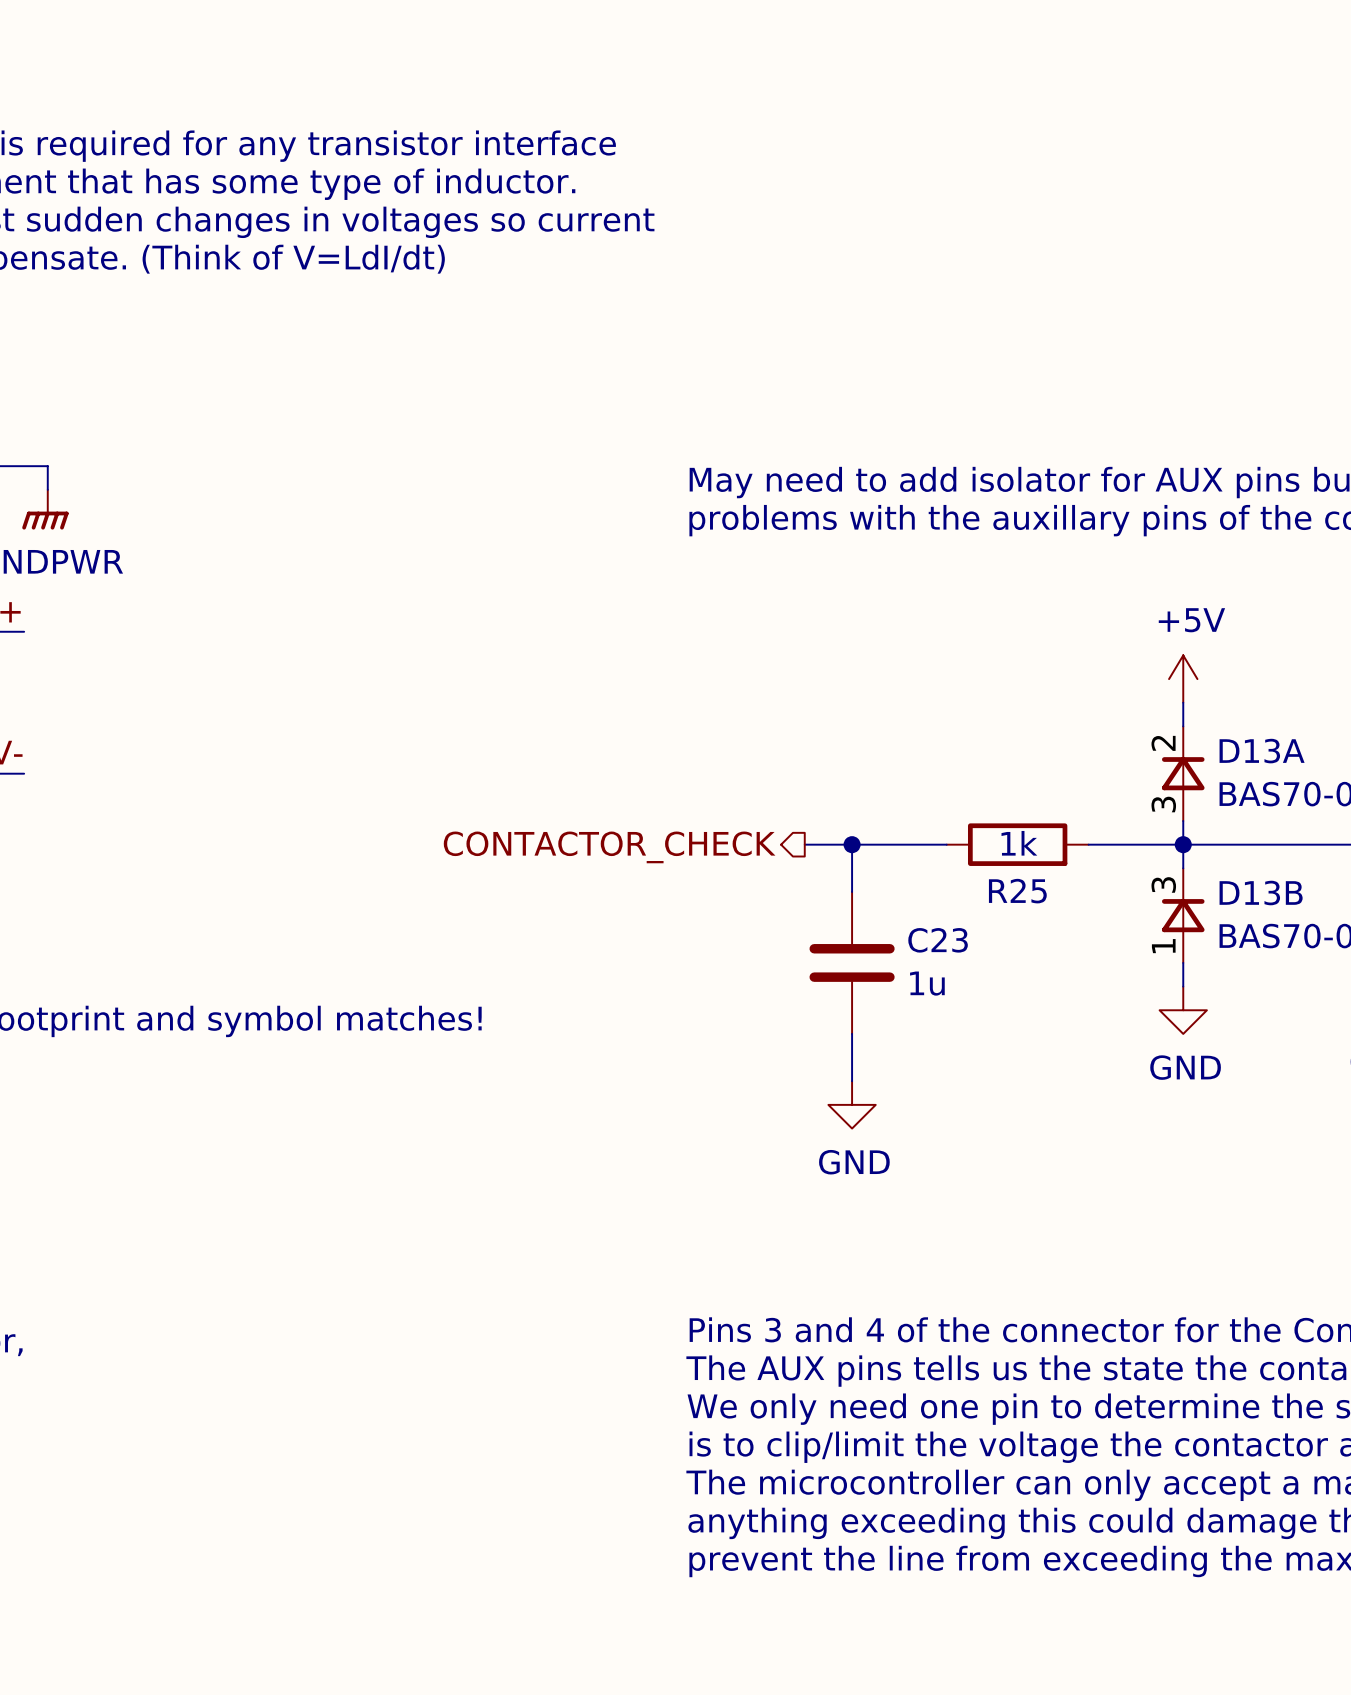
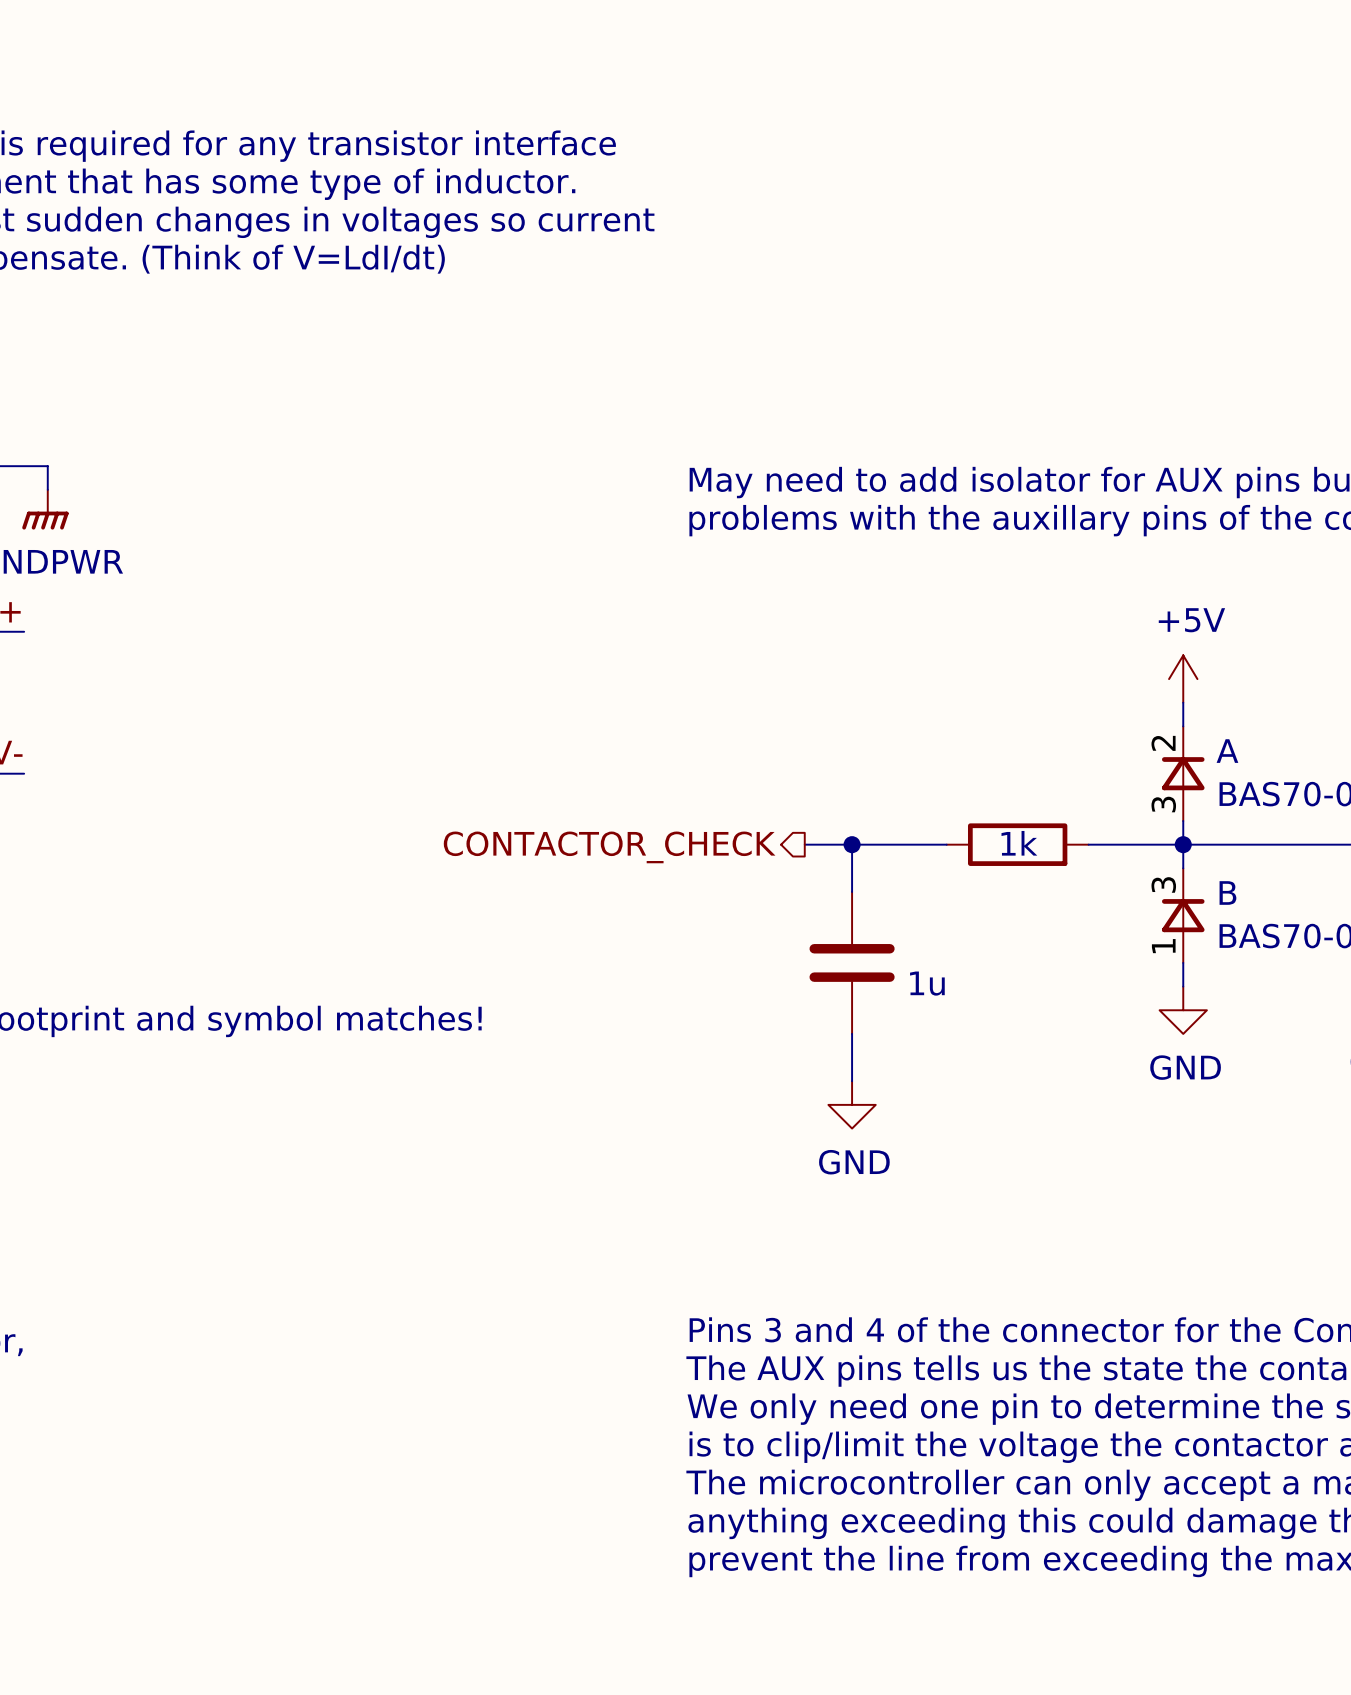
D13A name: D13A (1262, 751) -> A (1227, 751)
R25 name: R25 (1017, 891) -> none
D13B name: D13B (1261, 893) -> B (1227, 892)
C23 name: C23 (938, 940) -> none

